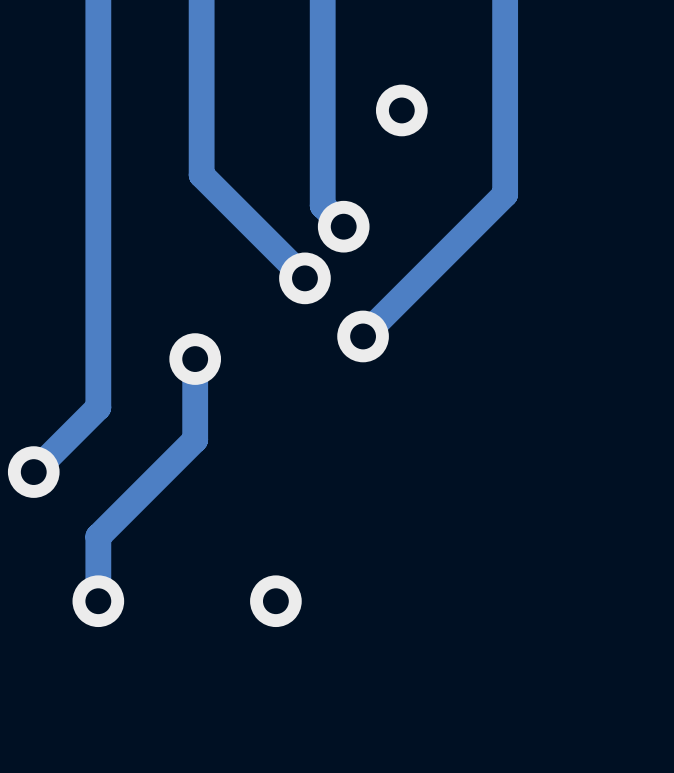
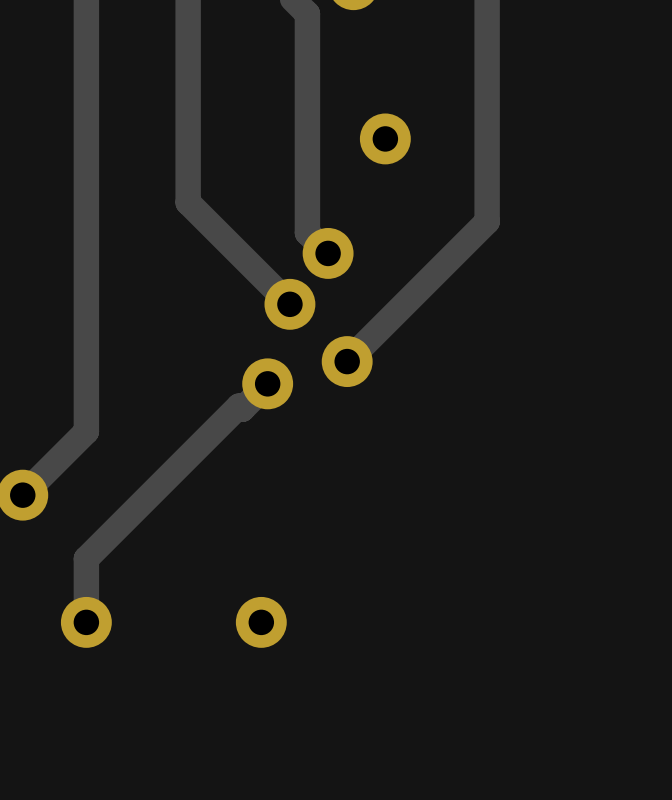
track: (195, 359) (195, 439) -> (267, 383) (242, 409) (239, 406) (181, 463)
via position: (195, 359) -> (267, 383)

